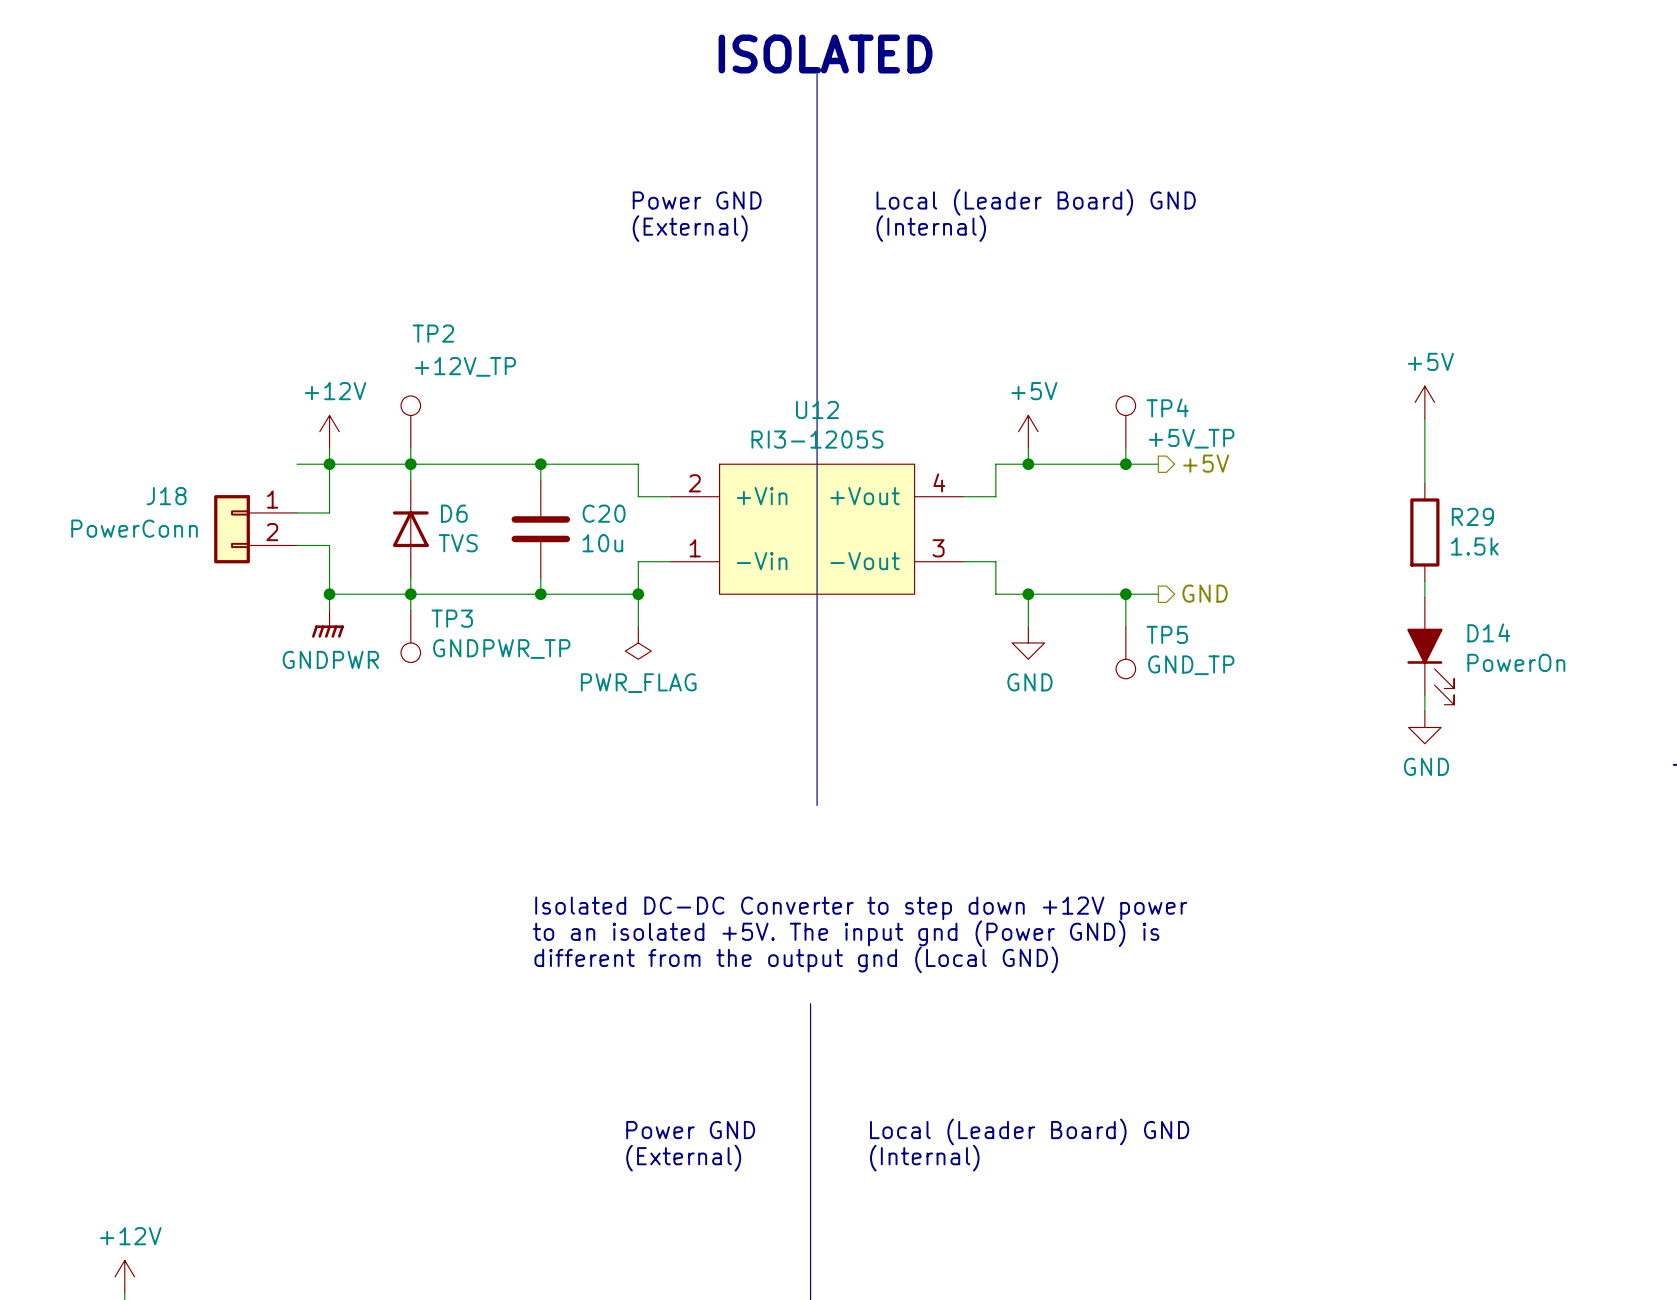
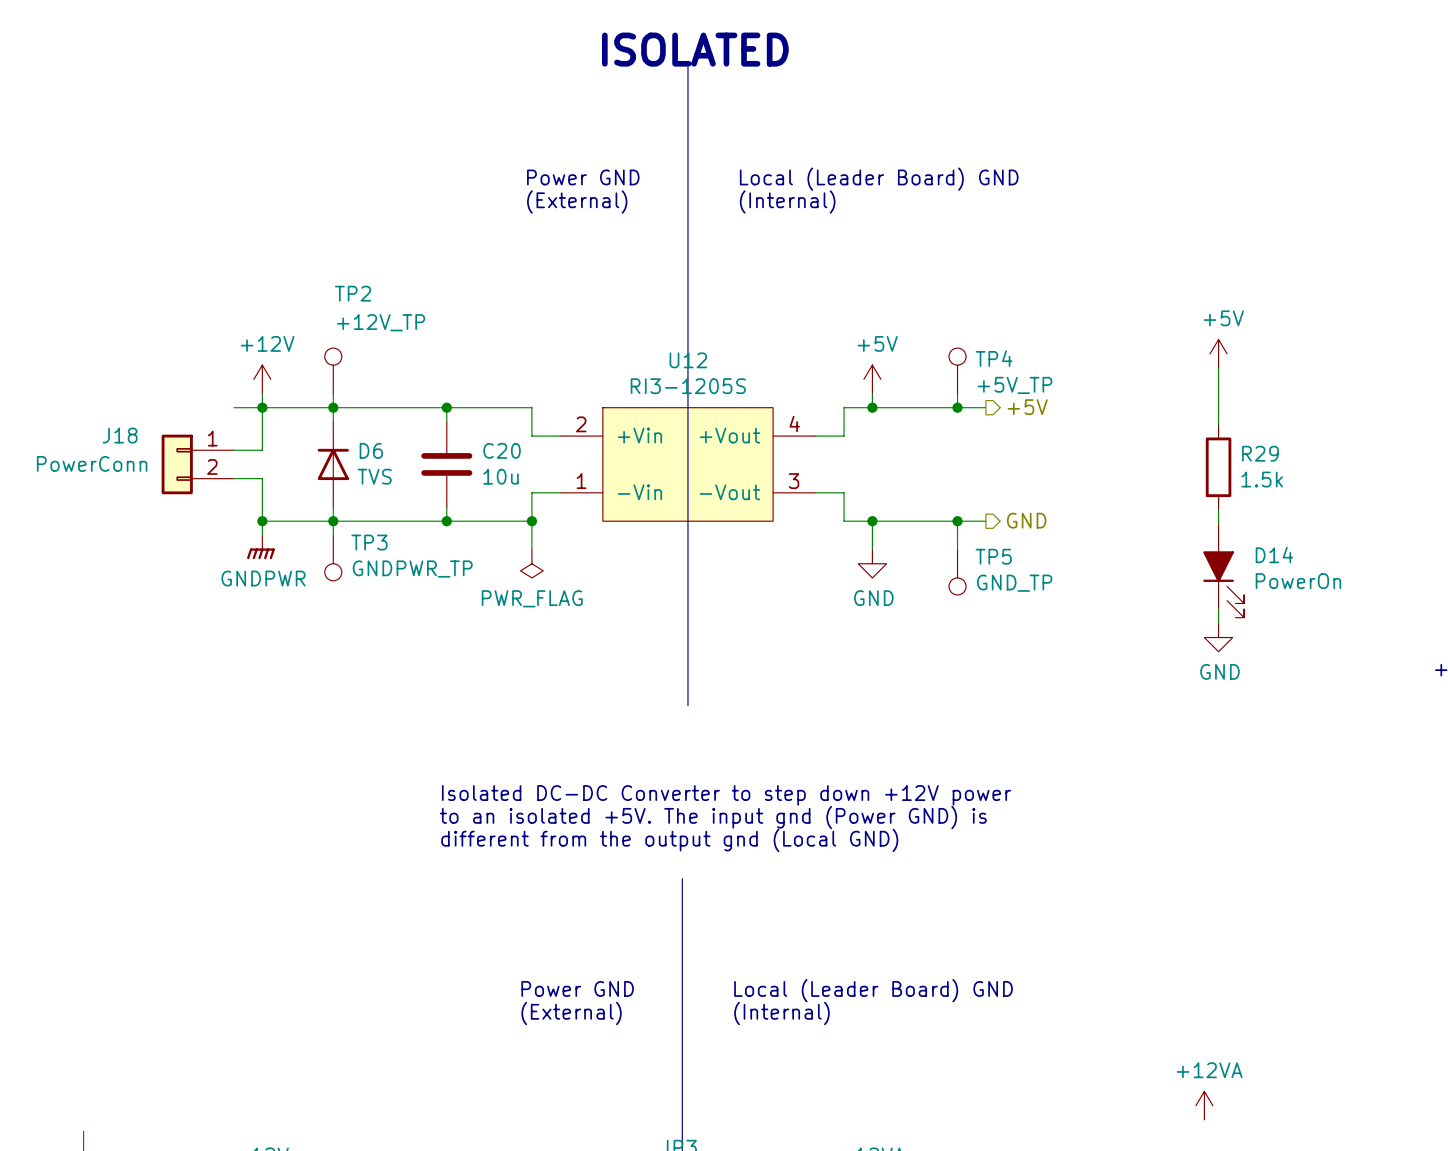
power symbol: none -> +12VA (1204, 1105)
power symbol: +12V (124, 1276) -> none

